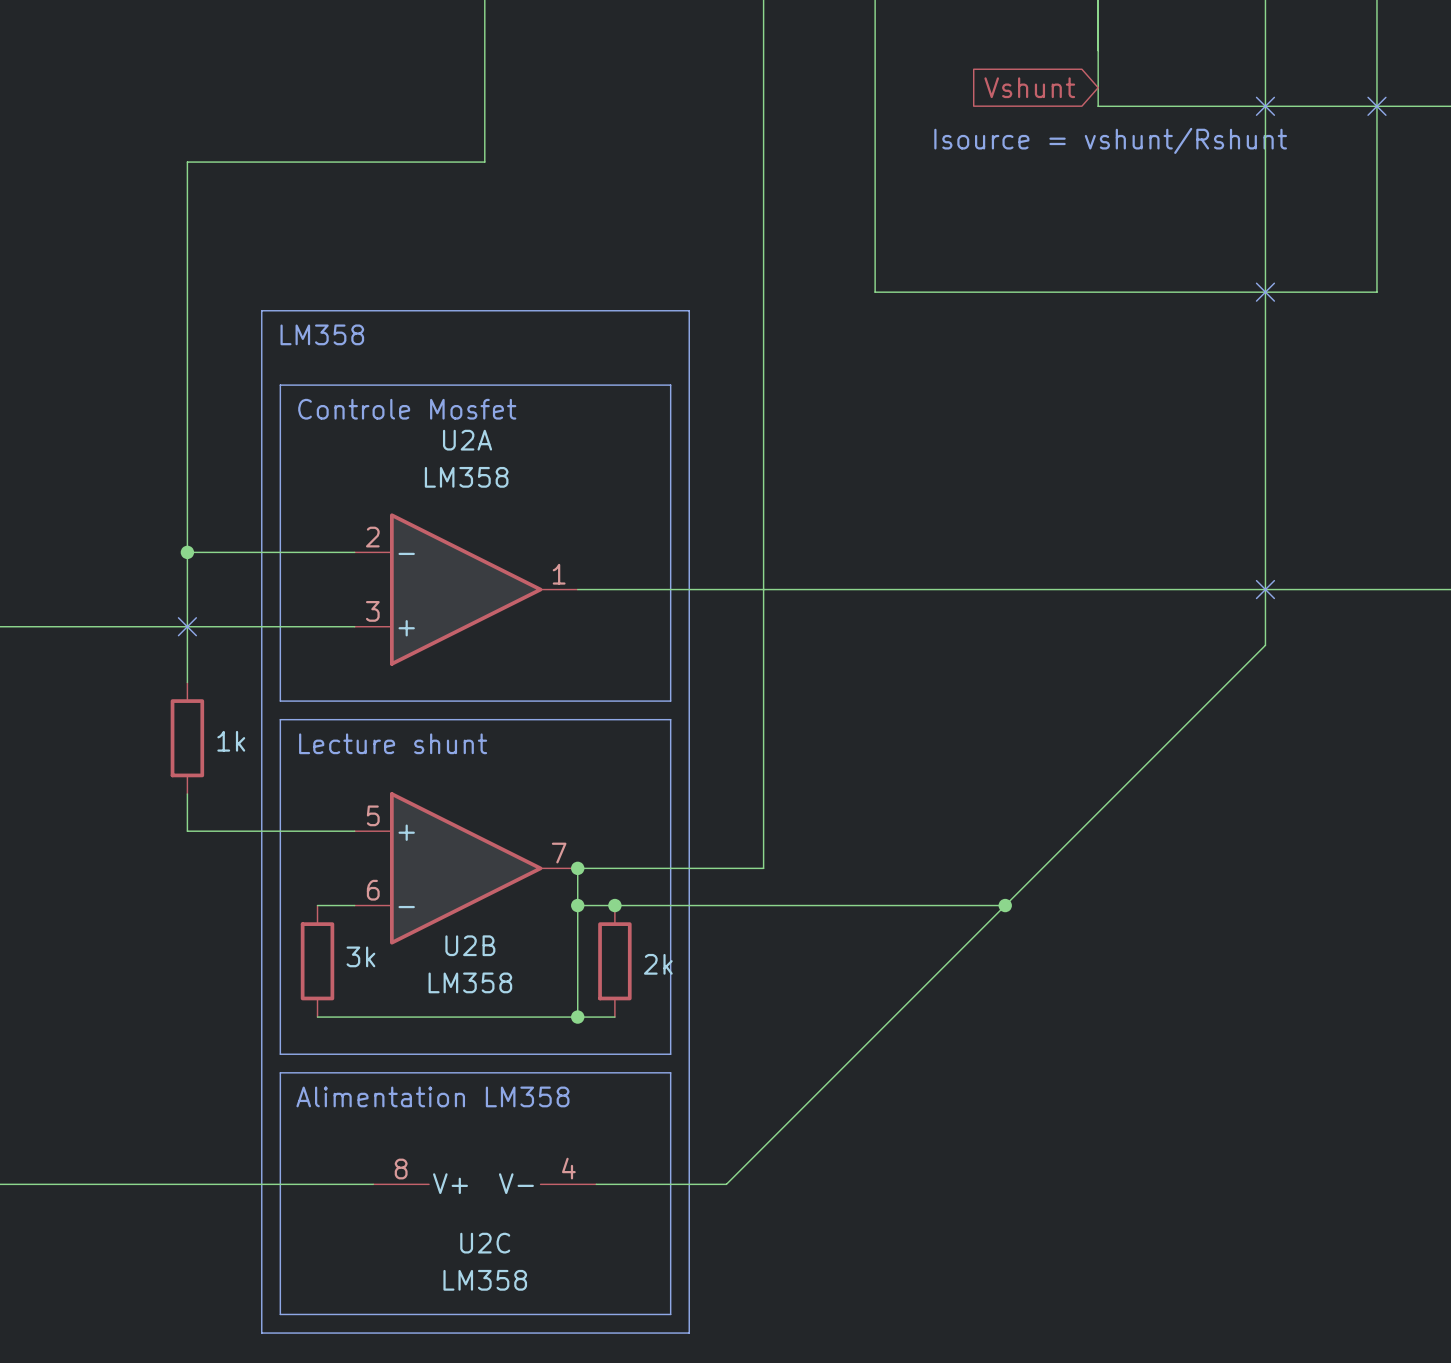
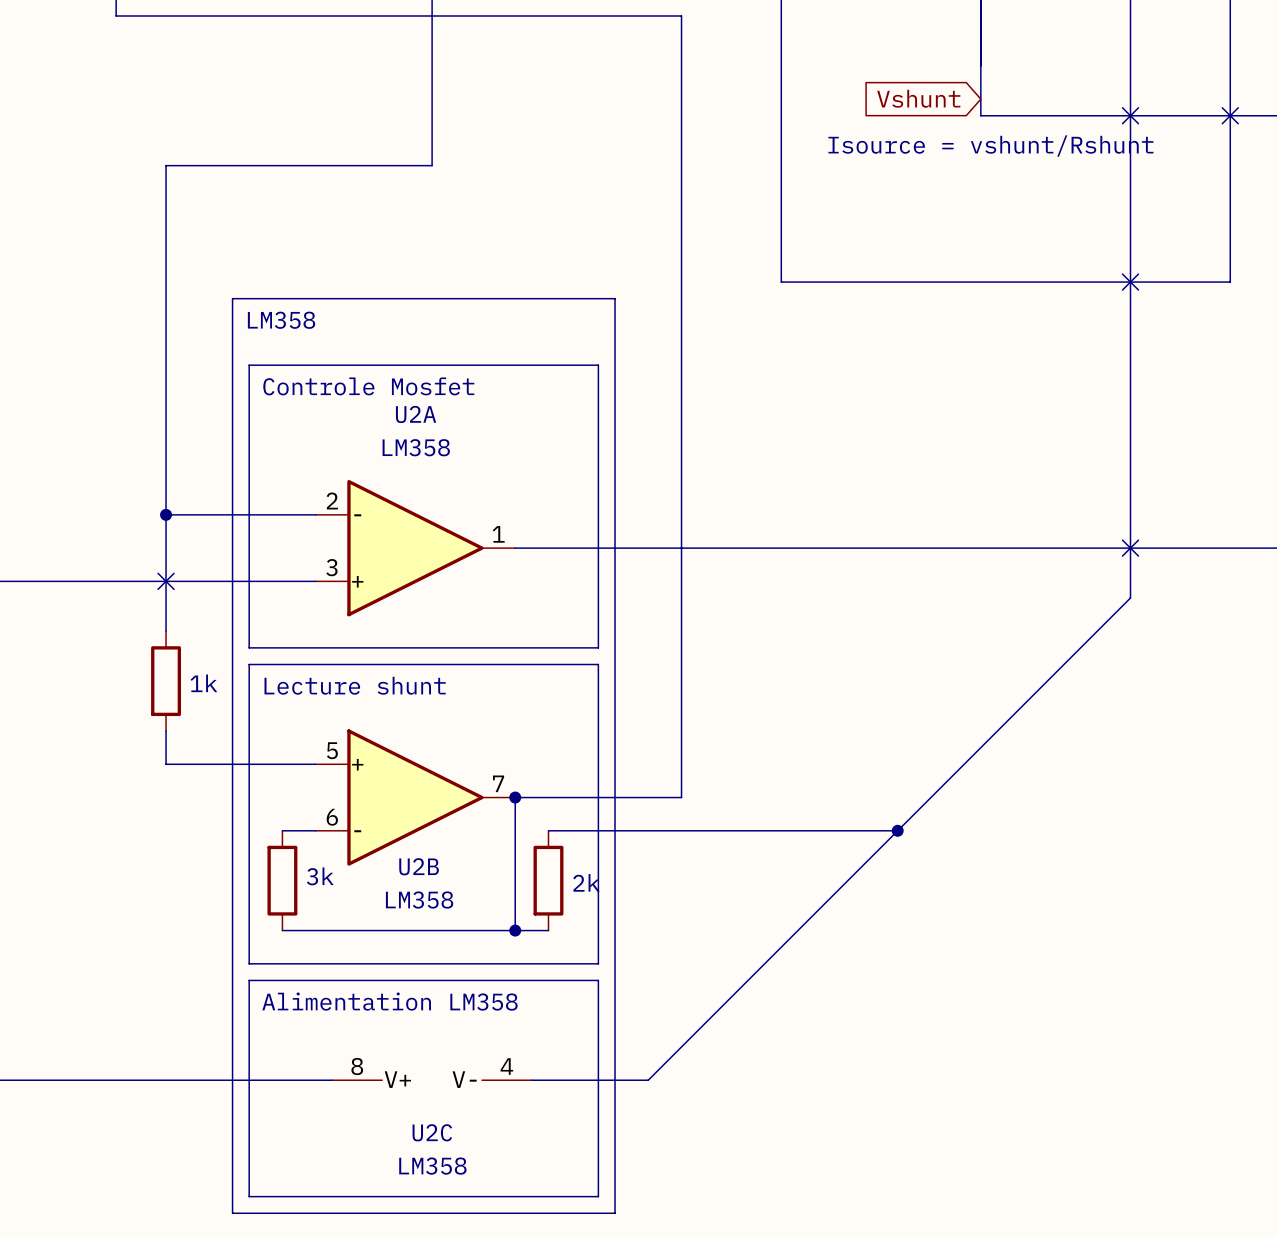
wire: (577, 905) (614, 905) -> none
junction: (577, 905) -> none
junction: (614, 905) -> none

